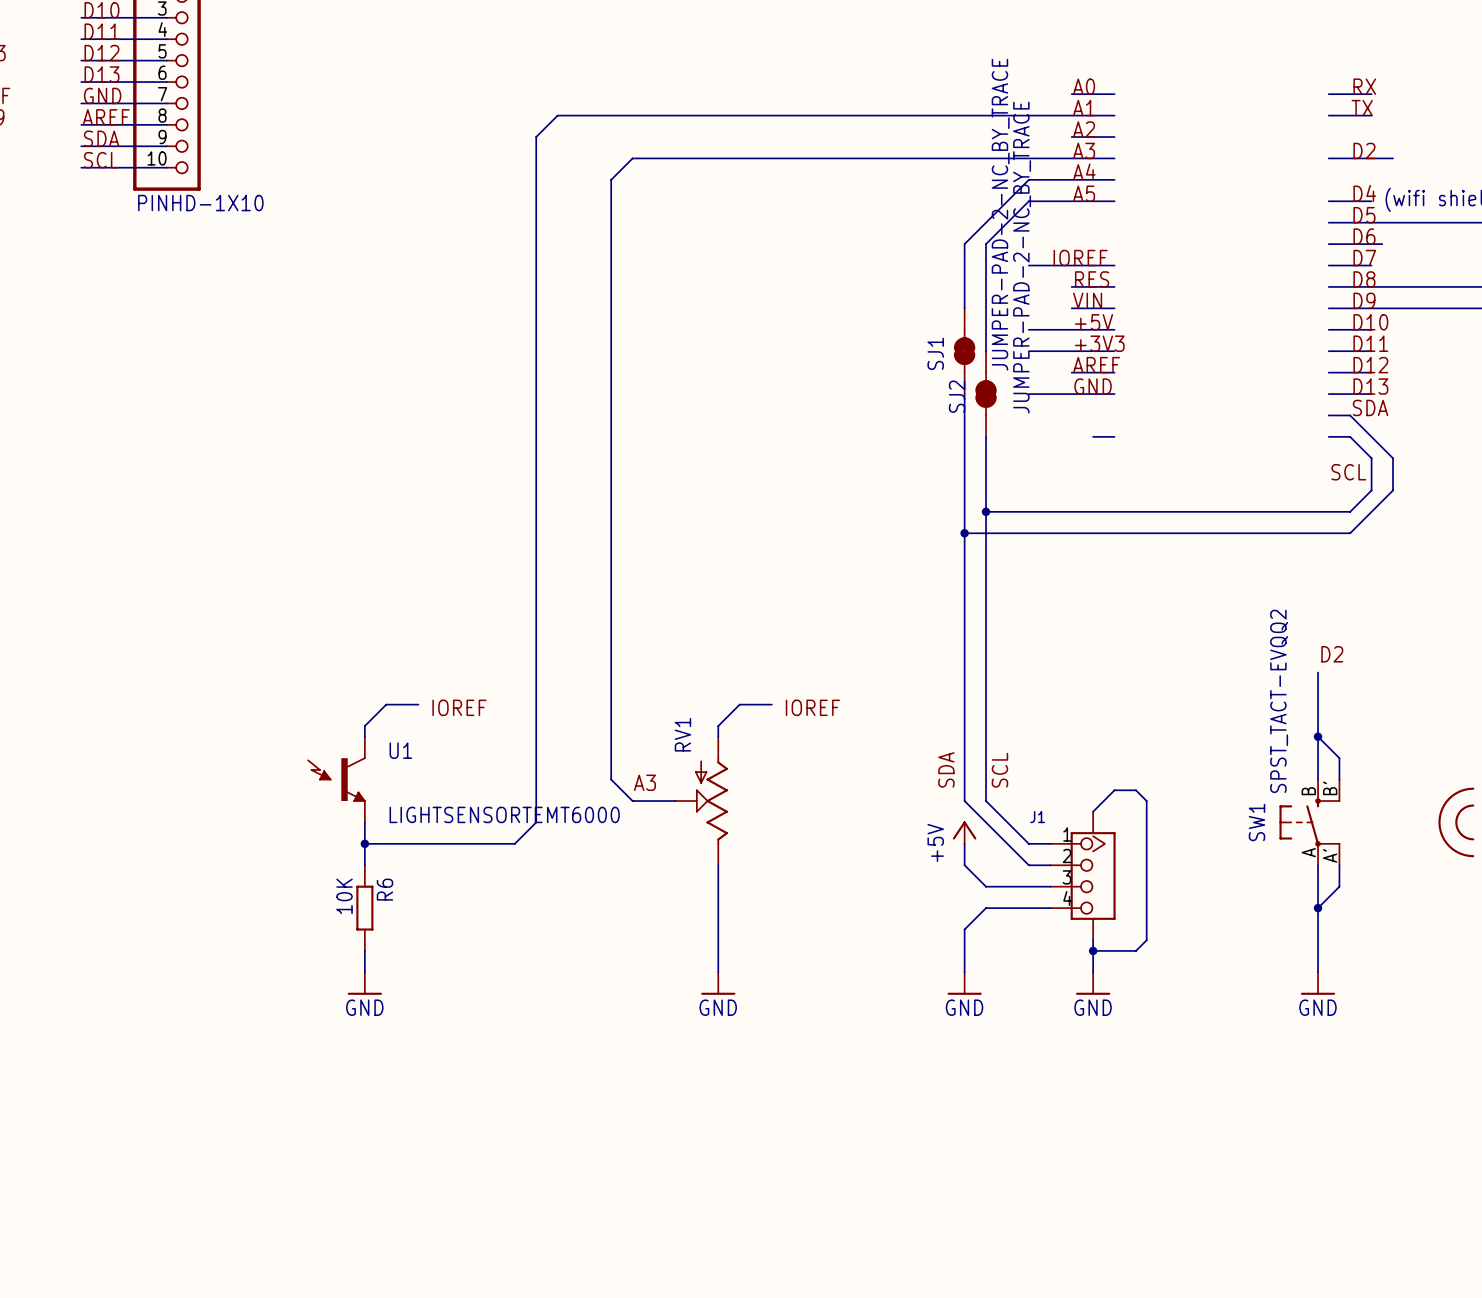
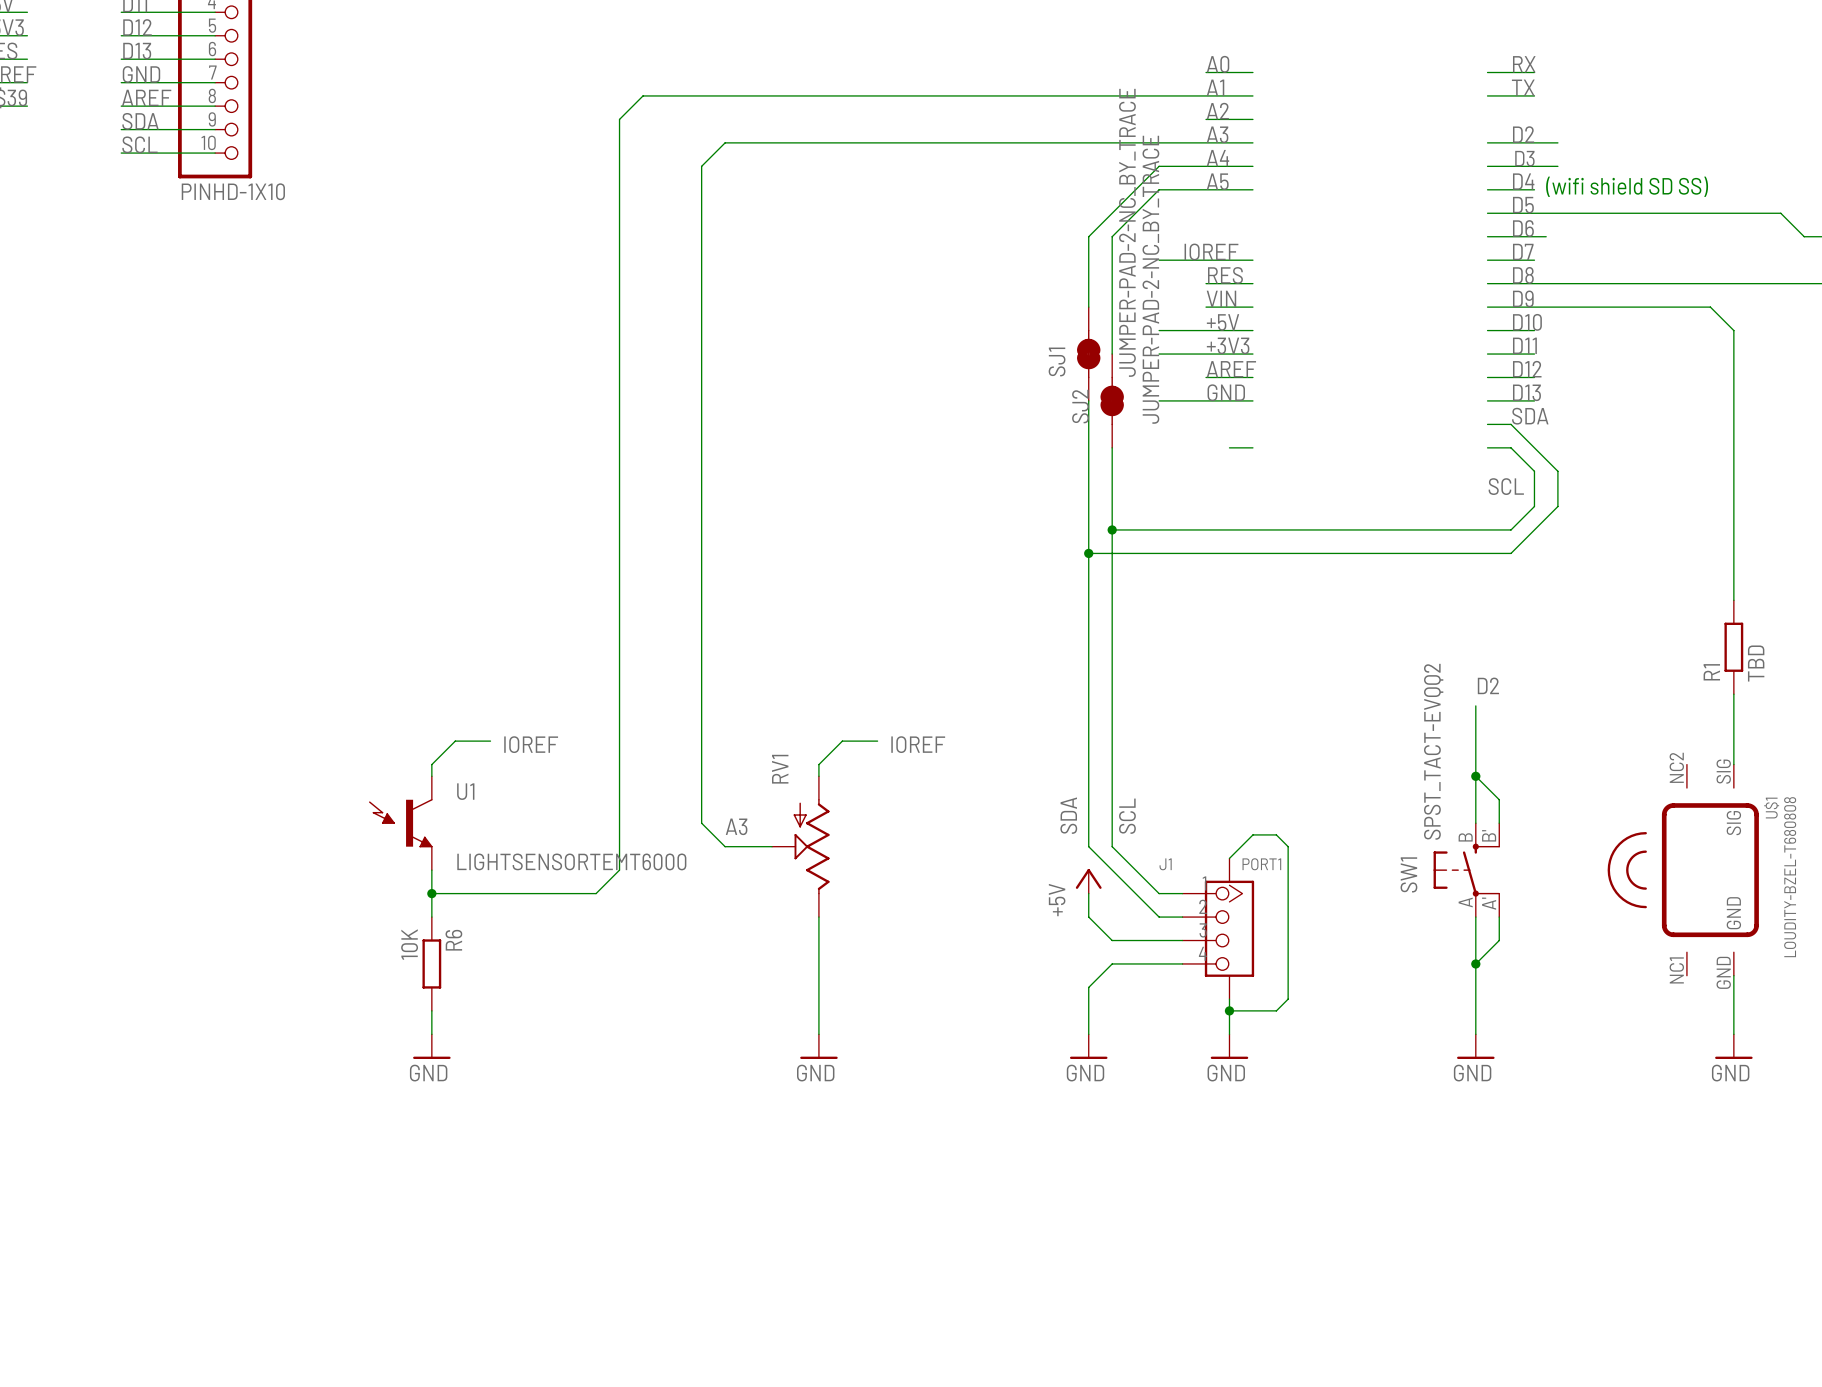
label: none -> D3 (1524, 158)
wire: none -> (1487, 166) (1557, 166)
J1 value: none -> PORT1 (1261, 864)

